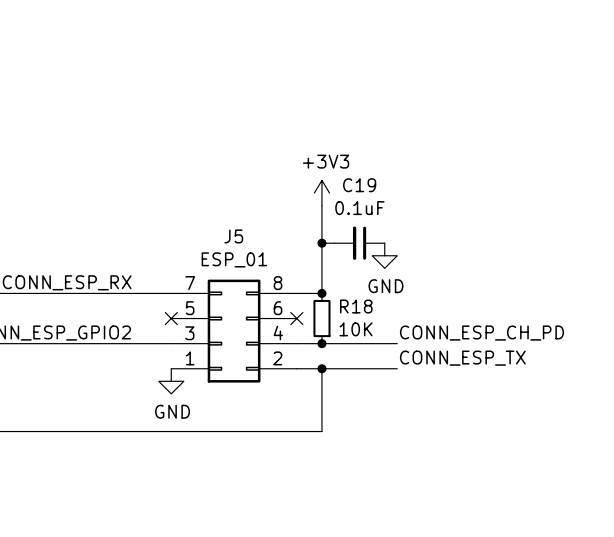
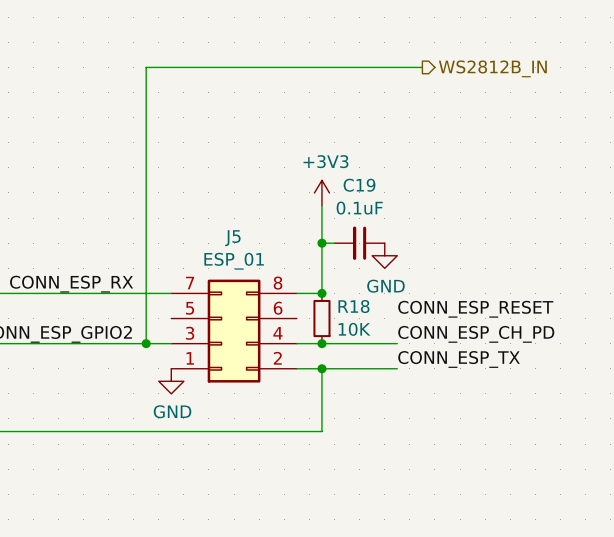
wire: none -> (422, 67) (146, 67) (146, 343)
hierarchical label: none -> WS2812B_IN (492, 68)
label: none -> CONN_ESP_RESET (475, 309)
no-connect mark: (171, 318) -> none
no-connect mark: (296, 318) -> none
junction: none -> (146, 343)

